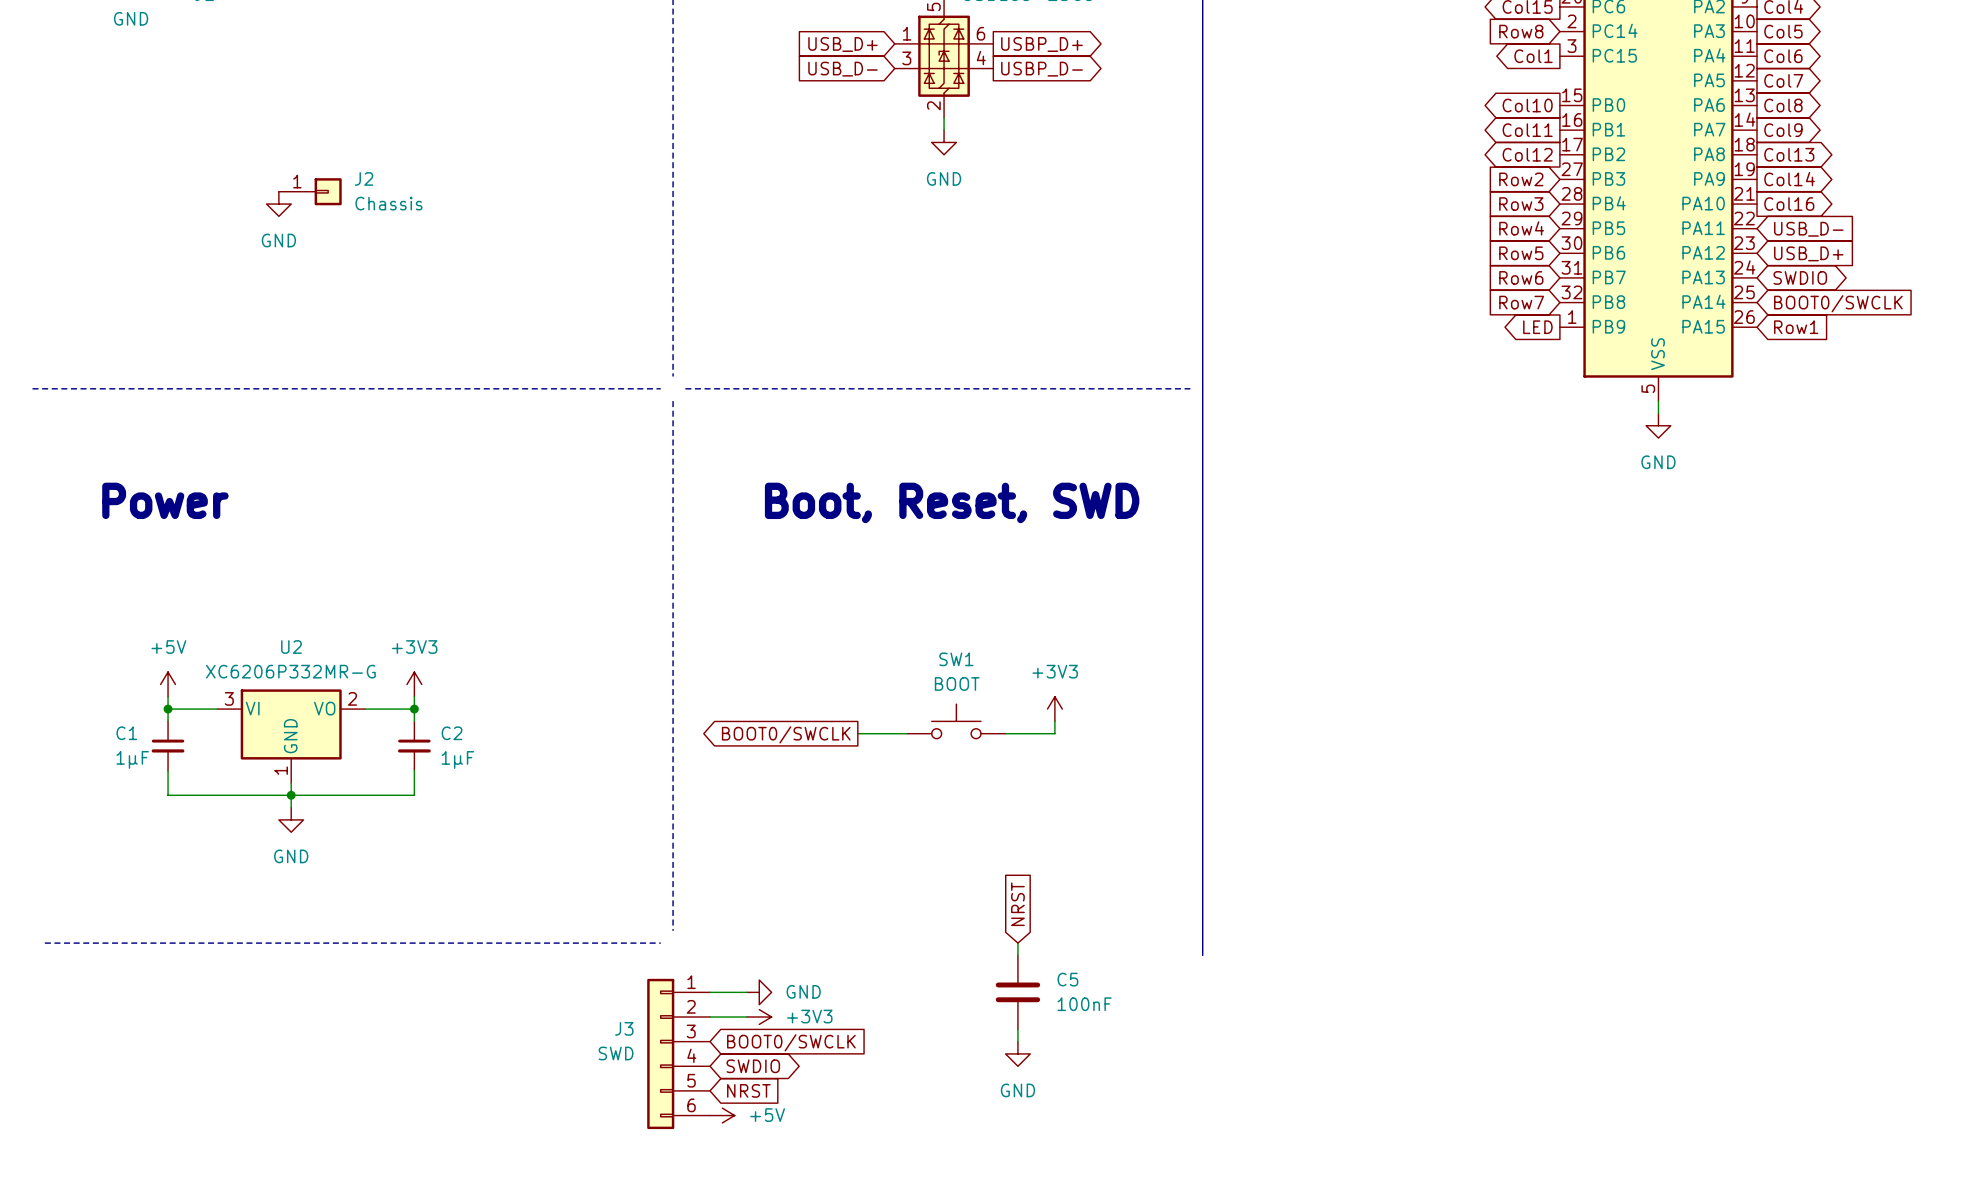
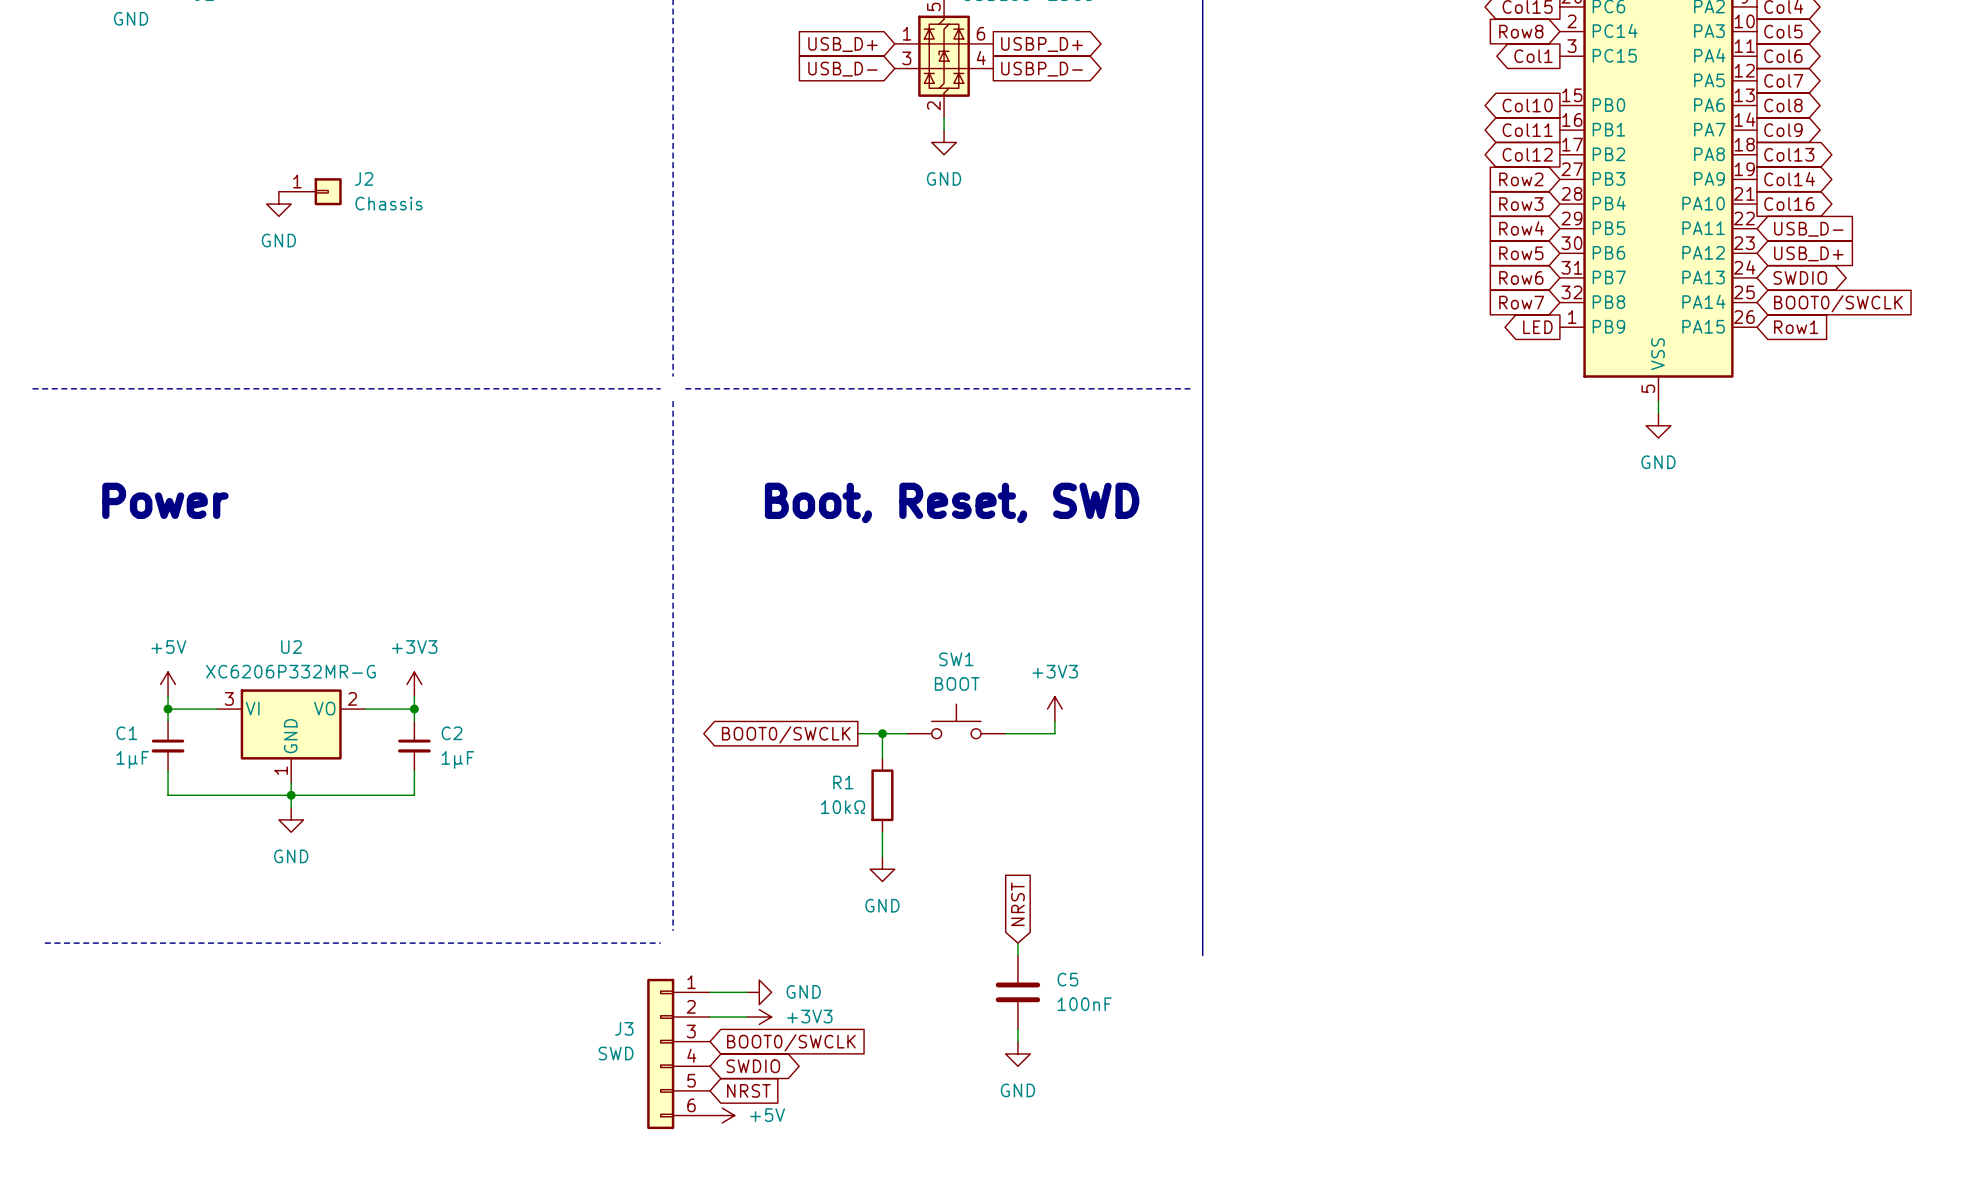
wire: none -> (882, 733) (882, 758)
junction: none -> (882, 733)
R1: none -> 10kΩ (882, 795)
wire: none -> (882, 832) (882, 856)
power symbol: none -> GND (882, 869)

